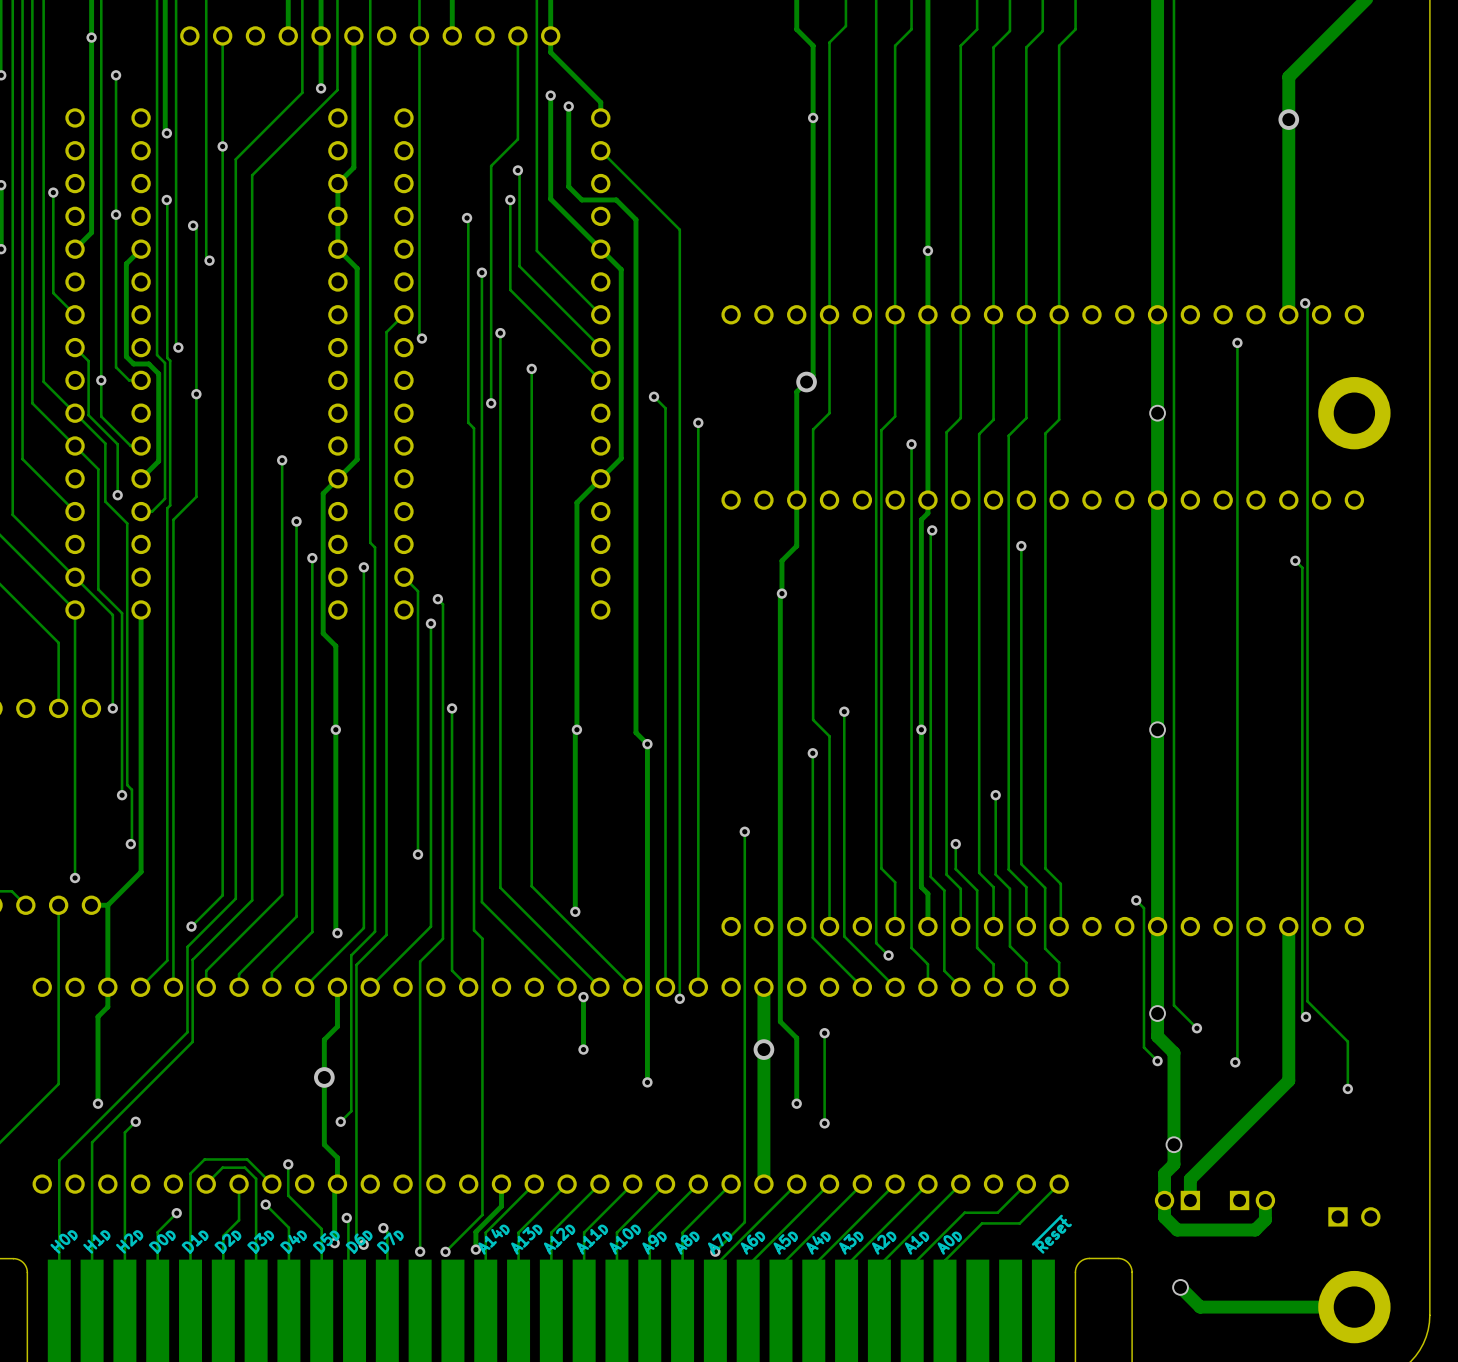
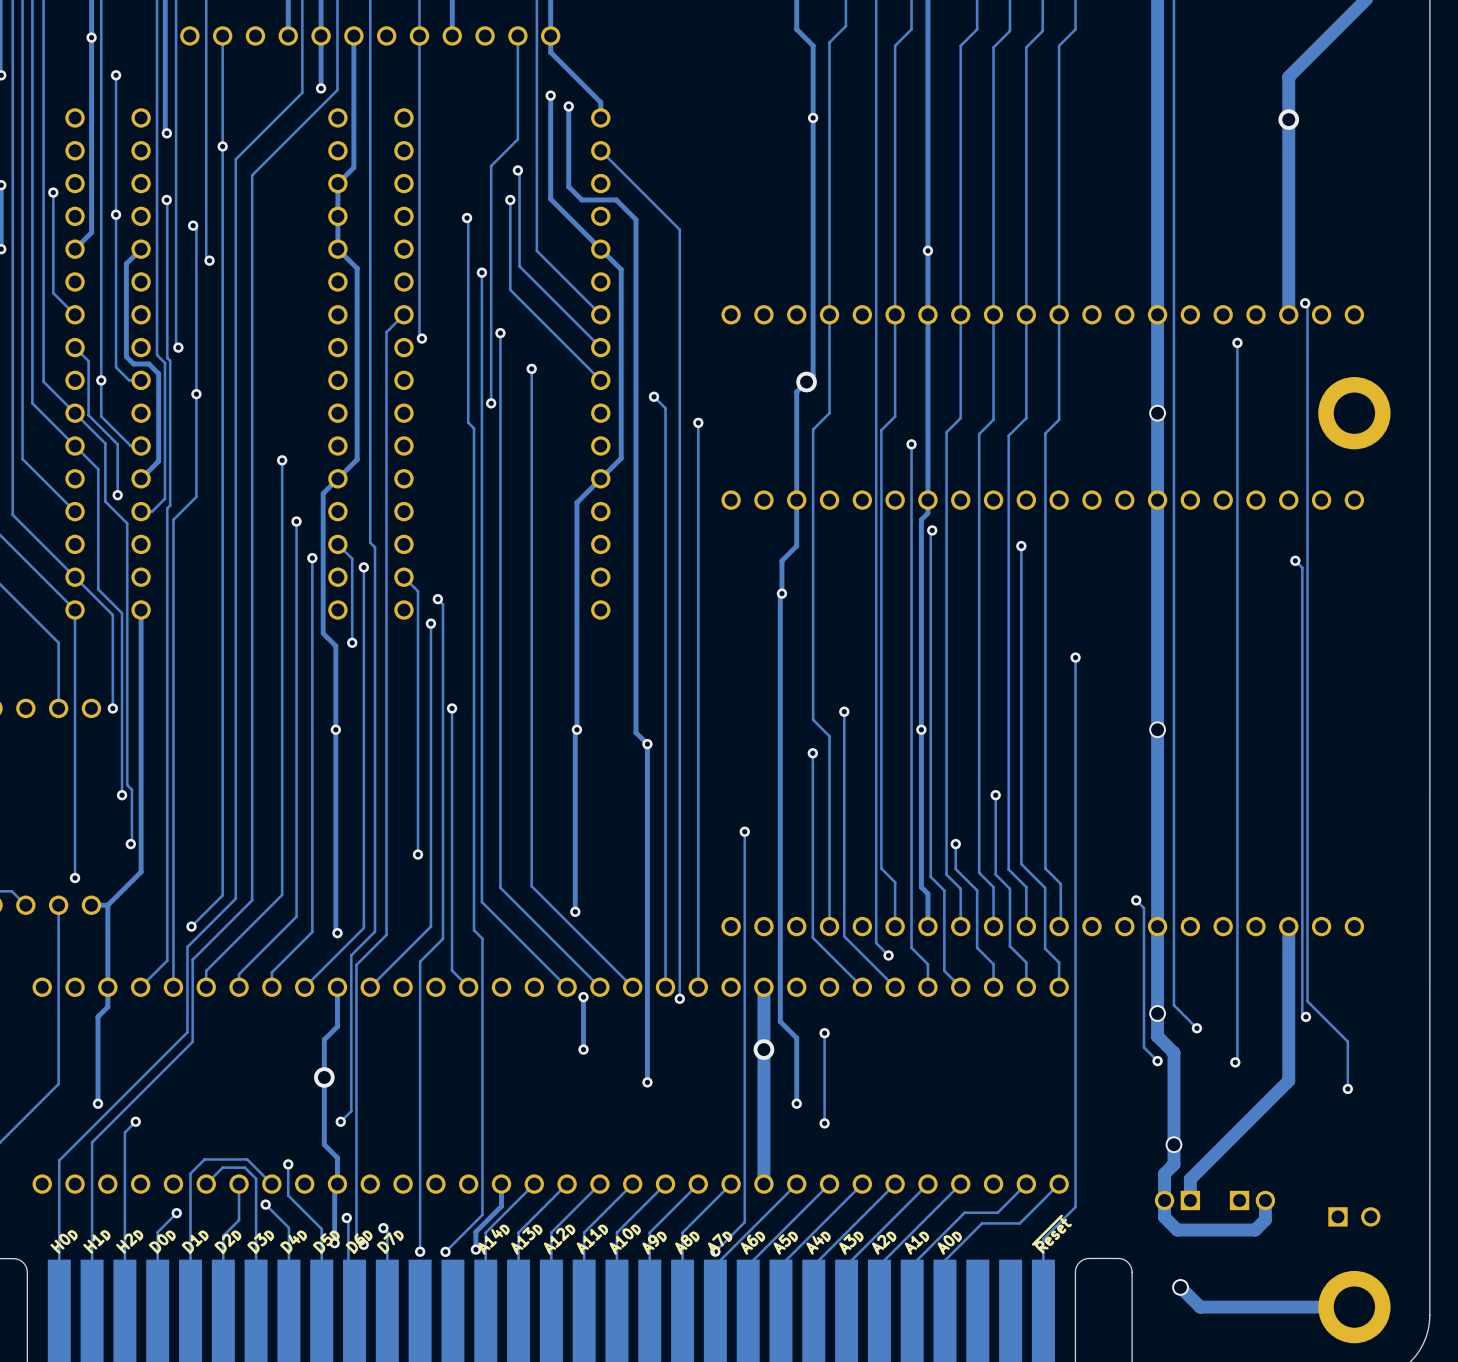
track: none -> (337, 544) (352, 558) (352, 642)
via: none -> (352, 642)
track: none -> (1075, 657) (1075, 1207) (1043, 1239) (1043, 1315)
via: none -> (1075, 657)

